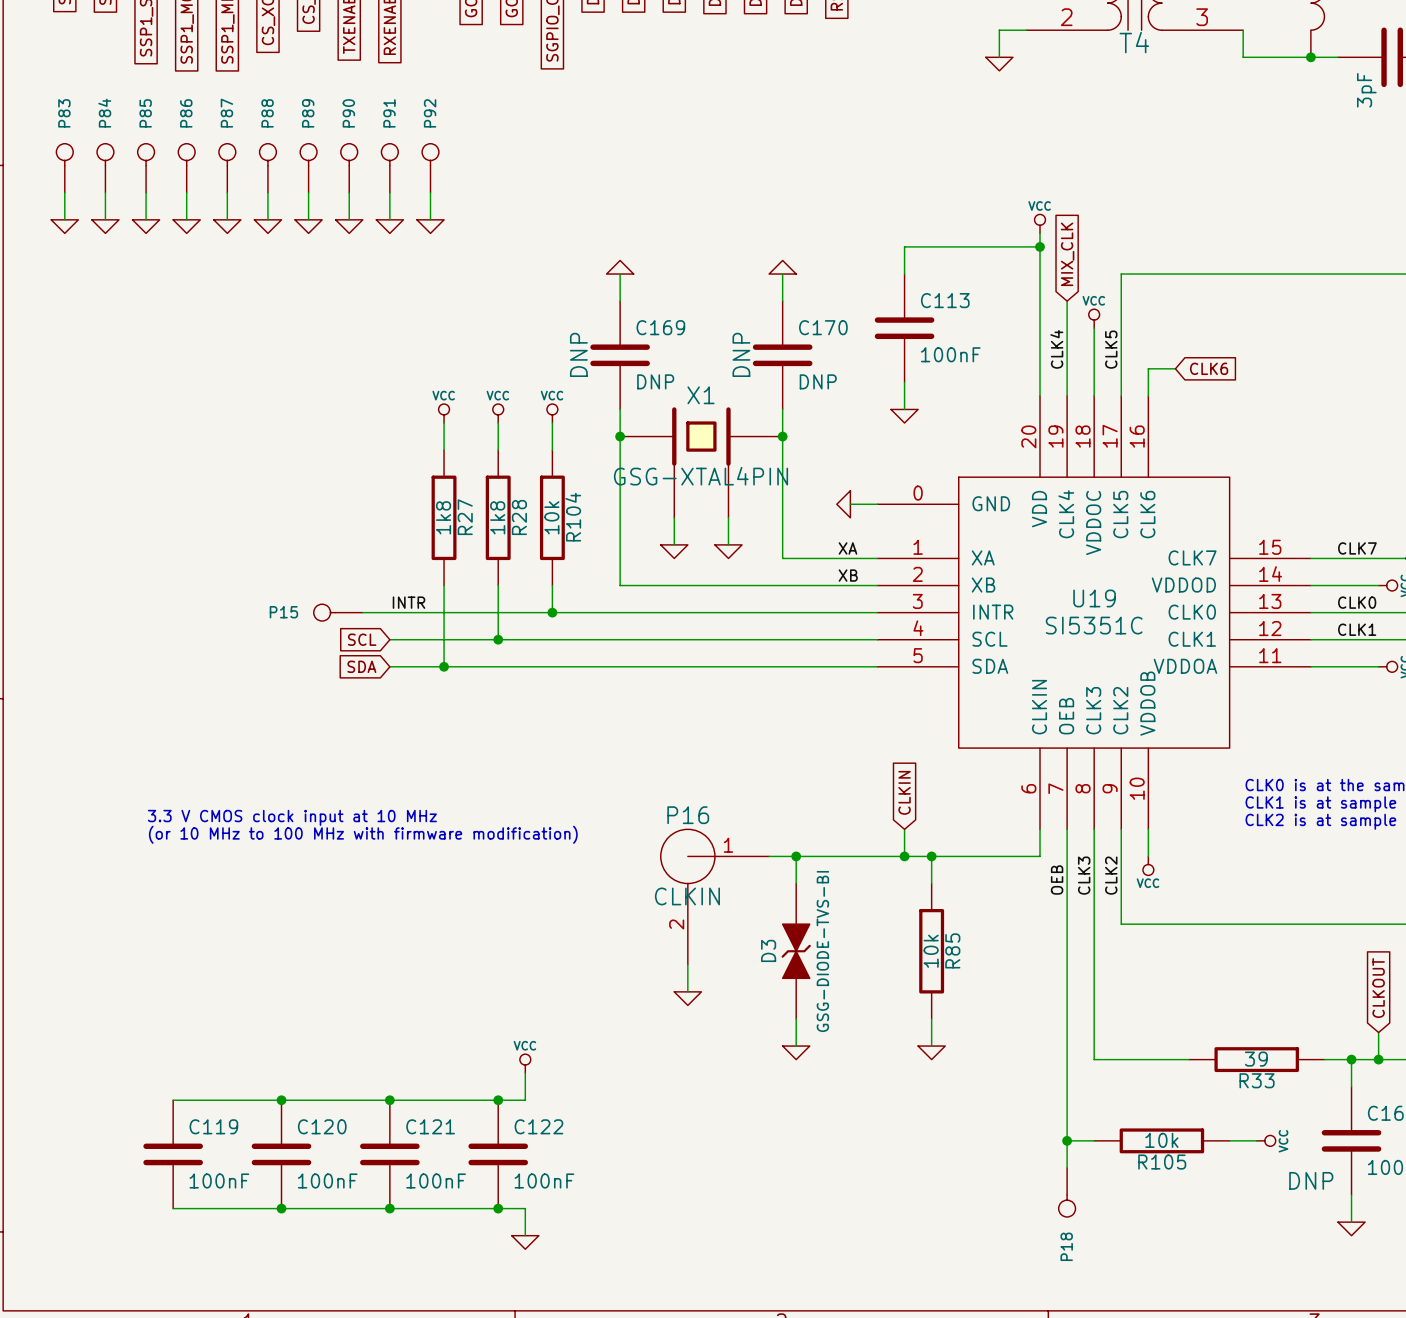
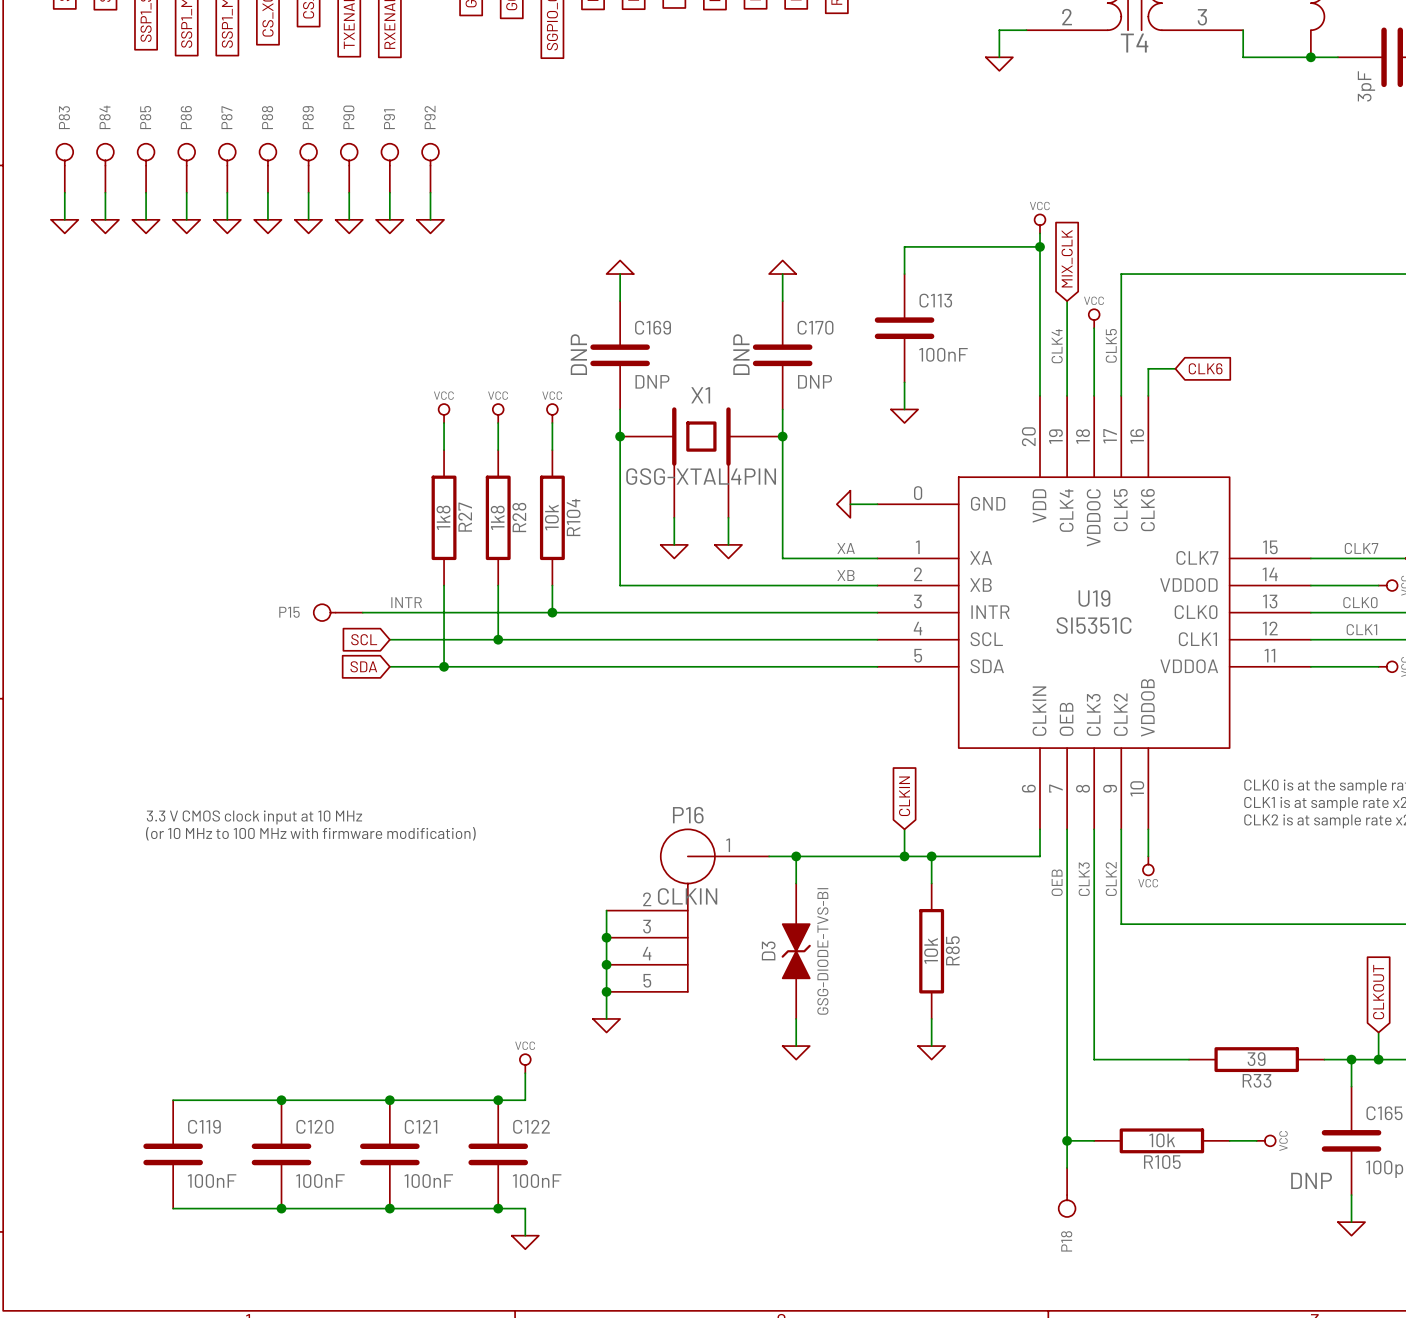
P16 symbol: [660, 829, 770, 965] -> [606, 829, 770, 992]
wire: none -> (606, 910) (606, 1018)
junction: none -> (606, 937)
junction: none -> (606, 964)
junction: none -> (606, 991)
power symbol position: (687, 998) -> (606, 1025)

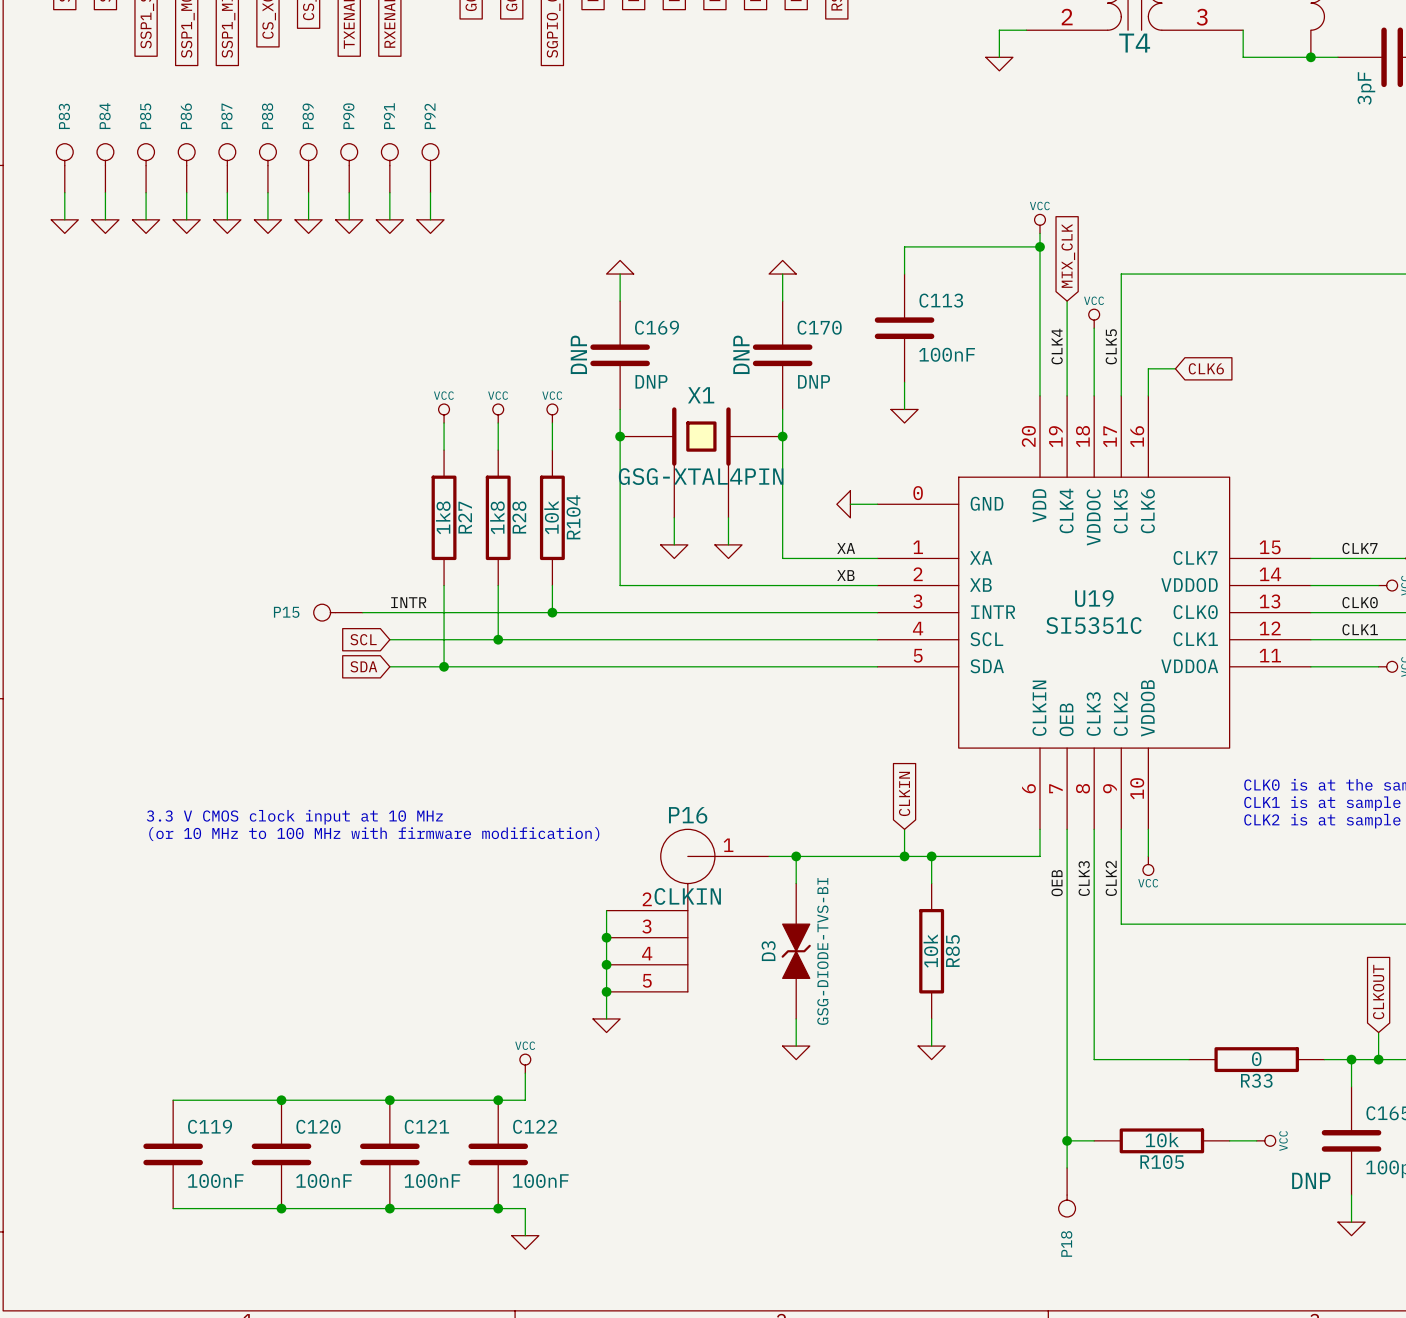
R33 value: 39 (1256, 1059) -> 0 (1256, 1059)

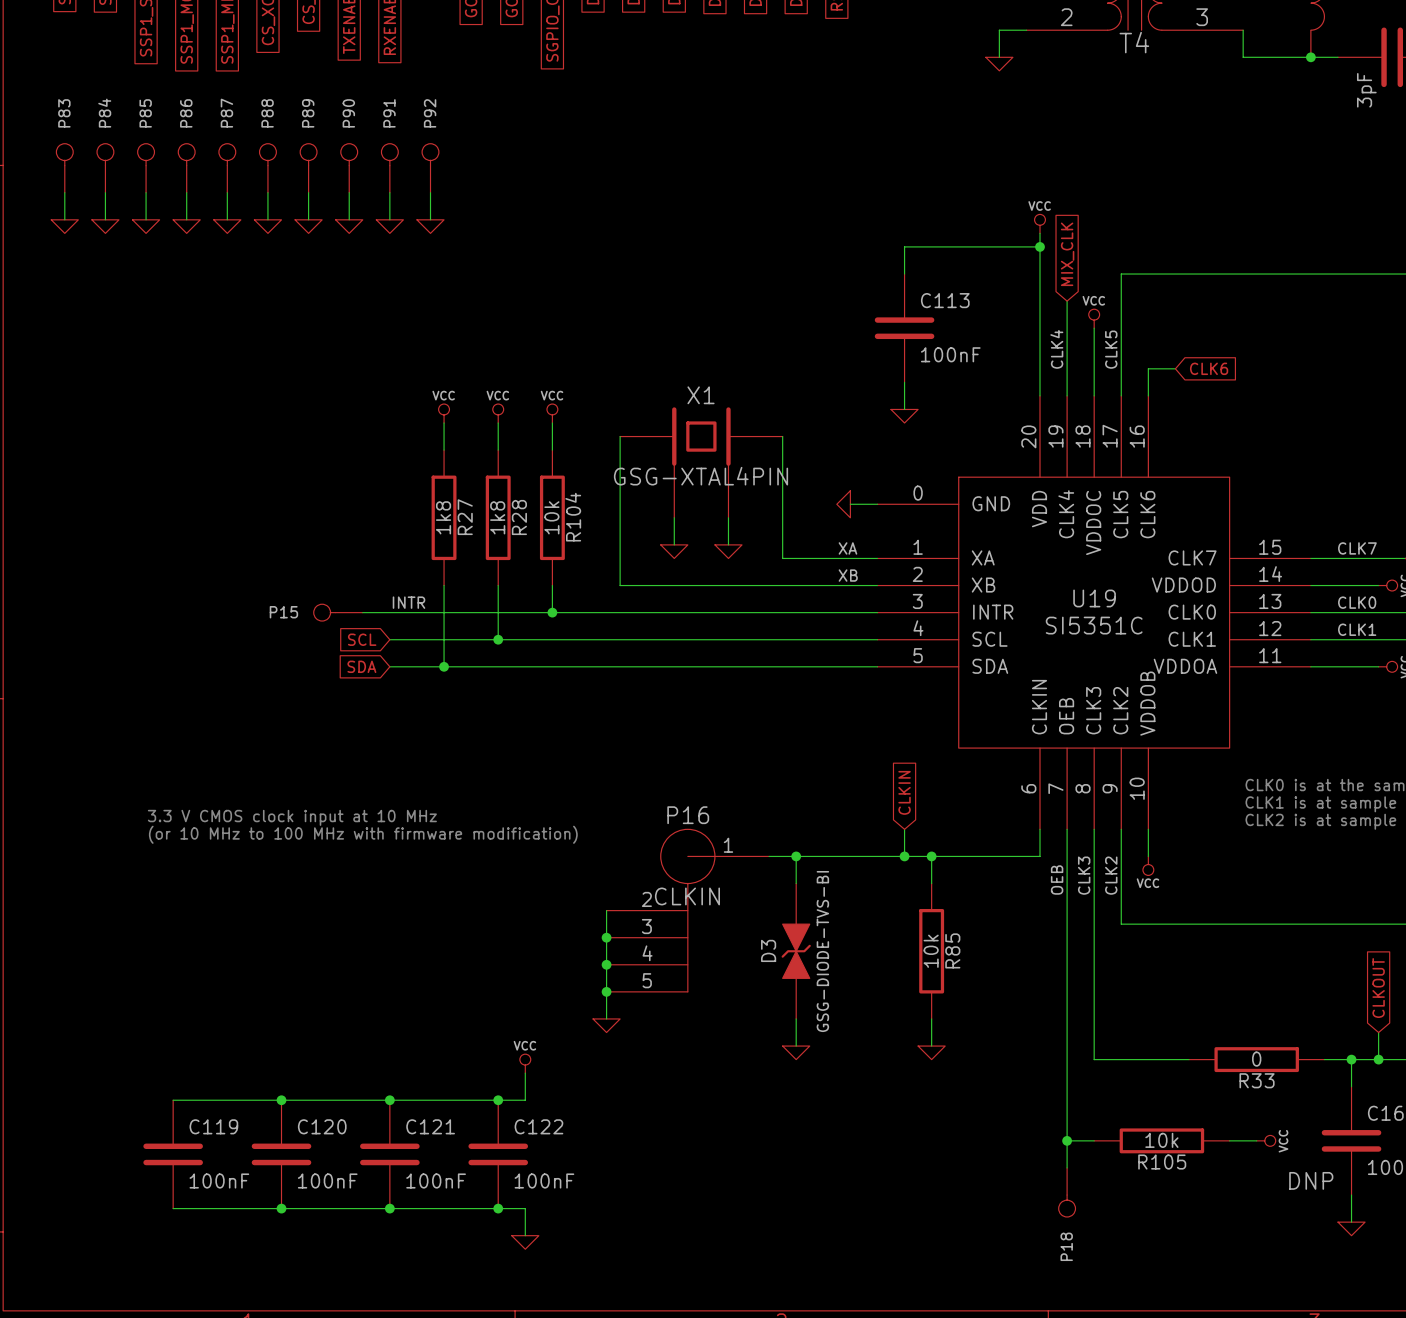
power symbol: (620, 267) -> none
power symbol: (782, 267) -> none
wire: (620, 274) (620, 301) -> none
wire: (782, 274) (782, 301) -> none
C169: DNP (620, 355) -> none
C170: DNP (782, 355) -> none
wire: (620, 409) (620, 436) -> none
wire: (782, 409) (782, 436) -> none
junction: (620, 436) -> none
junction: (782, 436) -> none

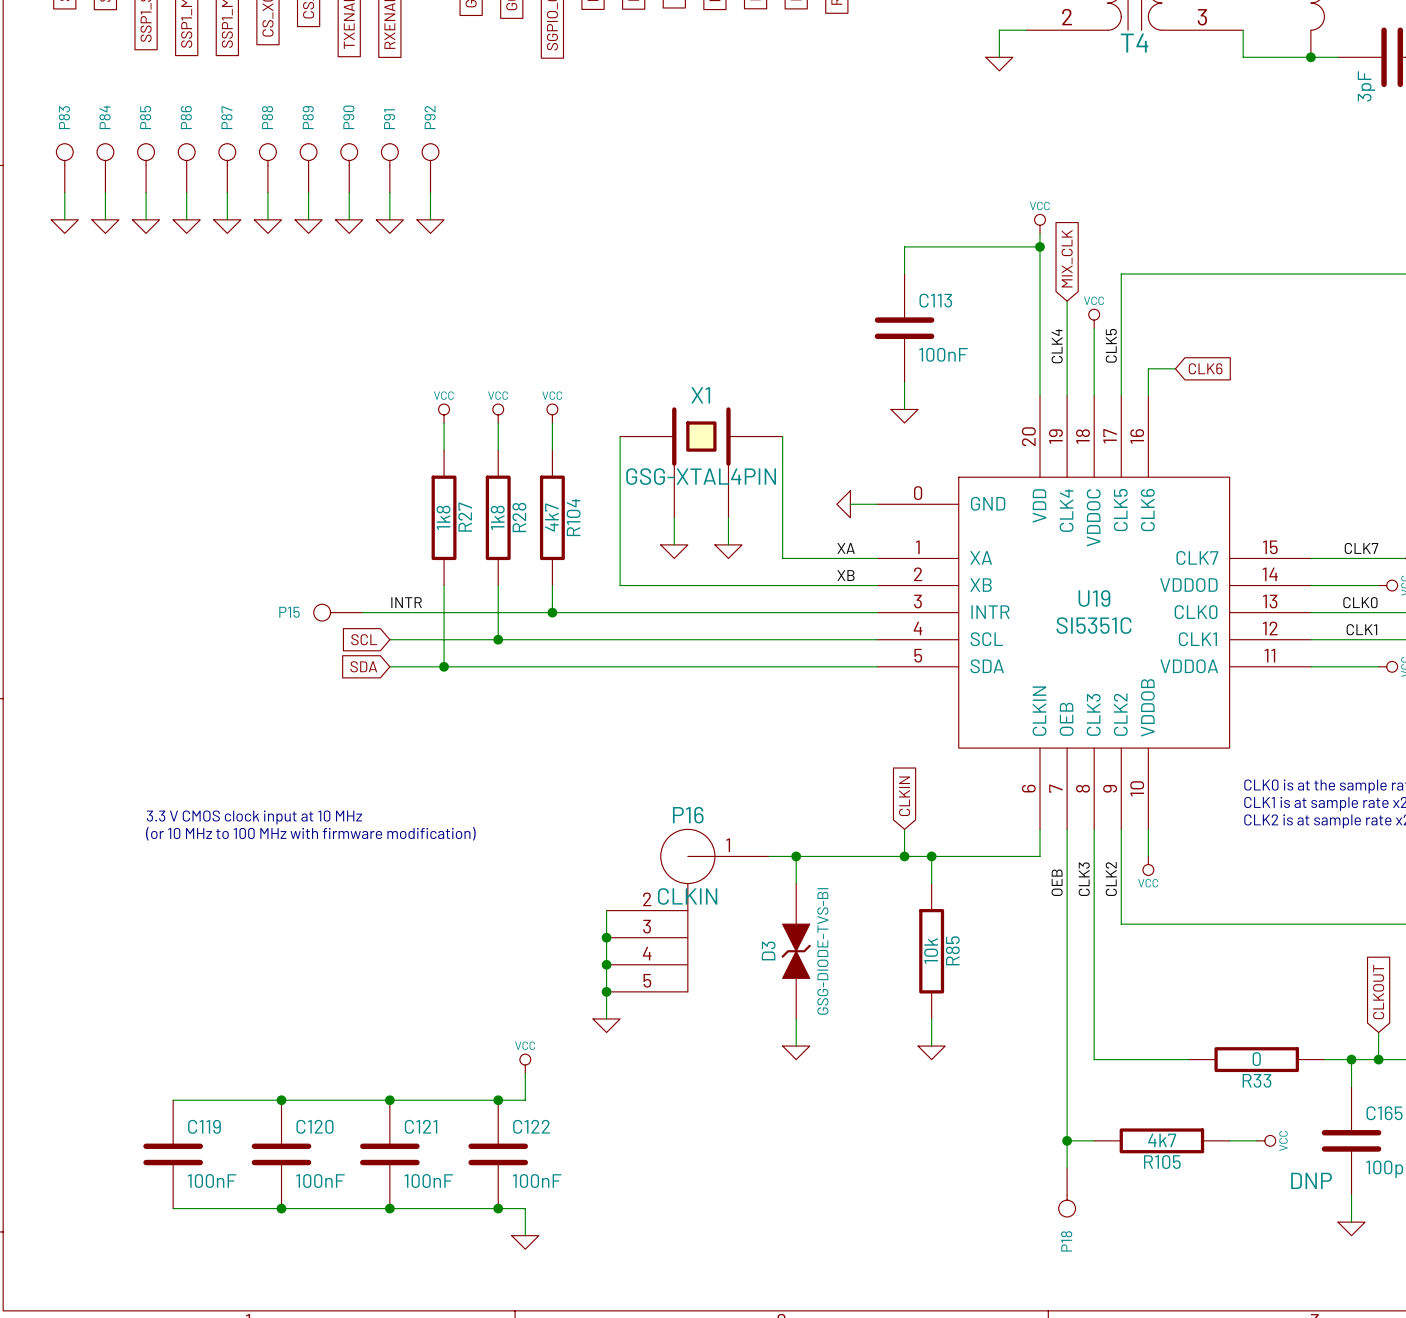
R104 value: 10k (551, 517) -> 4k7 (551, 517)
R105 value: 10k (1161, 1140) -> 4k7 (1162, 1140)

